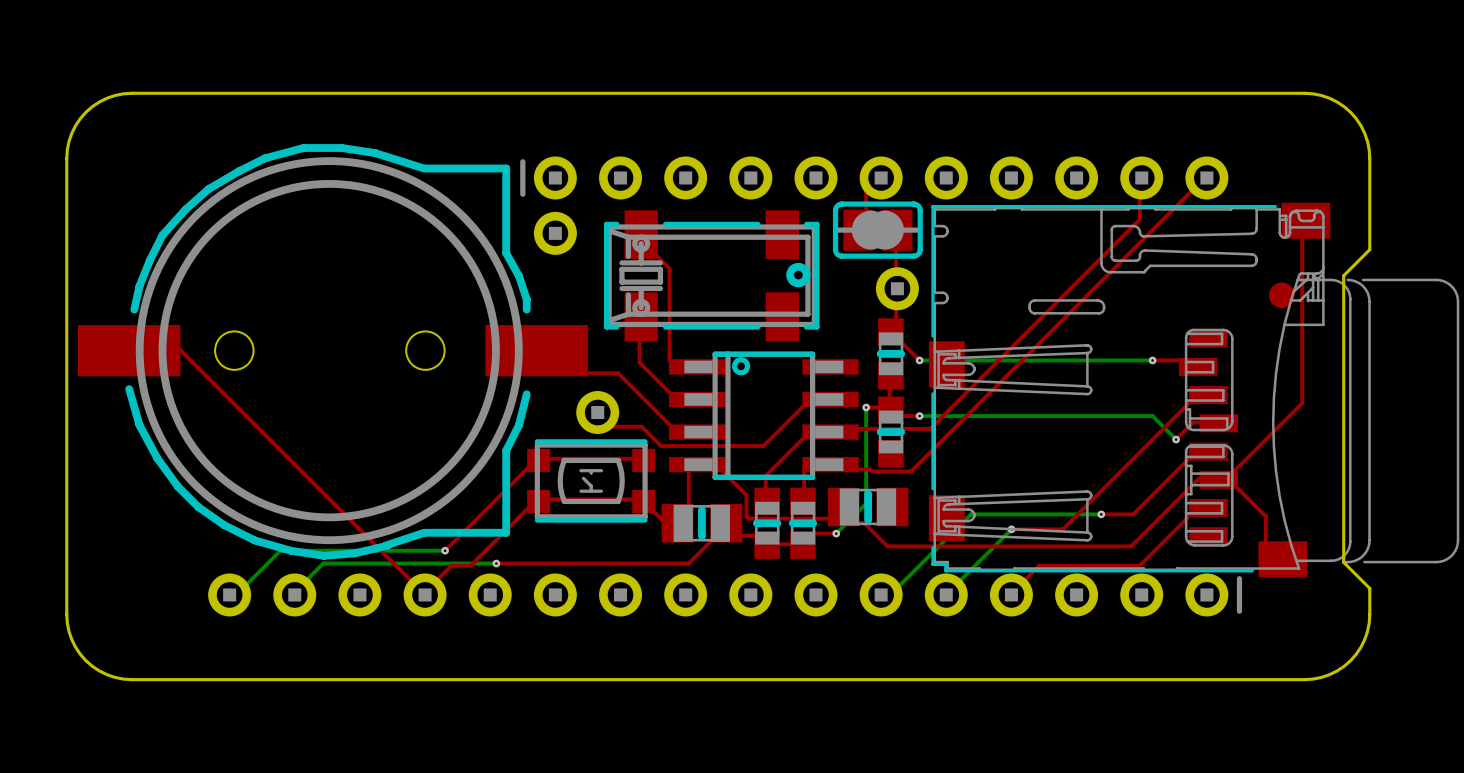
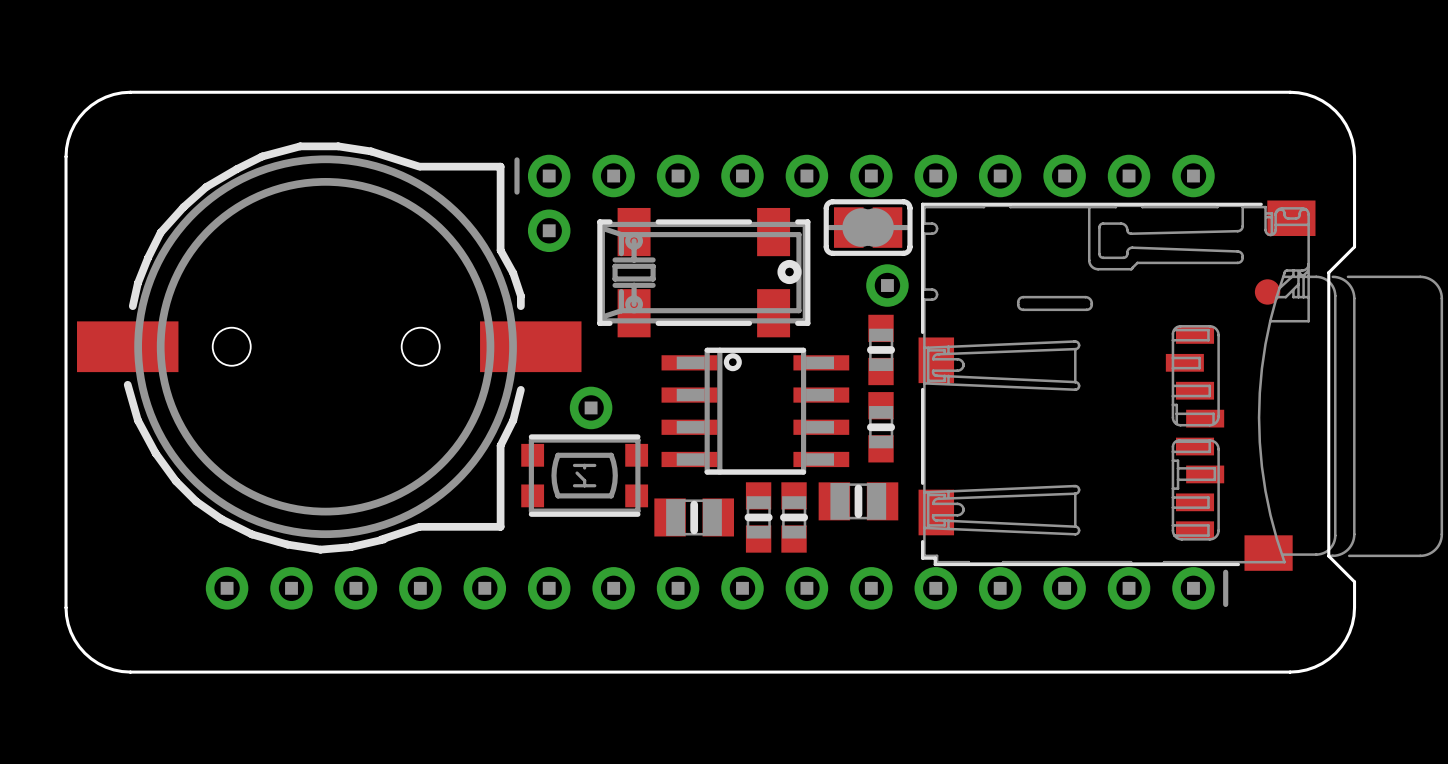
top track: (866, 191) (866, 210) -> none
top track: (1139, 191) (1139, 219) (930, 428) (855, 428) -> none
top track: (1191, 191) (911, 471) (855, 469) -> none
top track: (1302, 234) (1302, 403) (1233, 471) -> none
top track: (896, 249) (896, 272) -> none
top track: (654, 253) (669, 268) (669, 360) -> none
top track: (896, 302) (896, 322) -> none
top track: (639, 336) (639, 362) (669, 392) -> none
top track: (898, 339) (919, 360) -> none
top track: (177, 349) (180, 349) (408, 578) -> none
bottom track: (919, 360) (1152, 360) -> none
via: (919, 360) -> none
top track: (1152, 360) (1180, 360) -> none
via: (1152, 360) -> none
top track: (584, 373) (618, 373) (669, 424) -> none
top track: (889, 383) (889, 401) -> none
top track: (1191, 401) (1062, 529) (1011, 529) -> none
top track: (804, 405) (763, 445) (660, 445) (641, 426) (611, 426) -> none
top track: (866, 407) (881, 407) -> none
bottom track: (866, 407) (866, 503) (836, 533) -> none
via: (866, 407) -> none
top track: (898, 416) (919, 416) -> none
bottom track: (919, 416) (1152, 416) (1176, 439) -> none
via: (919, 416) -> none
top track: (1199, 422) (1193, 422) (1176, 439) -> none
top track: (804, 437) (765, 475) (765, 490) -> none
via: (1176, 439) -> none
top track: (1191, 456) (1133, 514) (1101, 514) -> none
top track: (543, 458) (635, 458) -> none
top track: (530, 465) (445, 550) -> none
top track: (688, 469) (688, 505) -> none
top track: (720, 469) (746, 495) (746, 516) (748, 518) (829, 518) -> none
top track: (804, 469) (804, 490) -> none
top track: (1199, 478) (1131, 546) (887, 546) (864, 522) (855, 522) -> none
top track: (1233, 484) (1265, 516) (1265, 544) -> none
top track: (543, 499) (635, 499) -> none
top track: (530, 505) (470, 565) (451, 565) (438, 578) -> none
top track: (648, 505) (663, 520) -> none
bottom track: (1101, 514) (970, 514) (896, 589) -> none
via: (1101, 514) -> none
top track: (1191, 514) (1139, 565) (1039, 565) (1024, 580) -> none
bottom track: (1011, 529) (960, 580) -> none
via: (1011, 529) -> none
top track: (836, 533) (812, 533) (810, 535) -> none
via: (836, 533) -> none
top track: (737, 535) (757, 535) -> none
top track: (712, 540) (688, 563) (496, 563) -> none
top track: (774, 544) (793, 544) -> none
bottom track: (445, 550) (280, 550) (244, 587) -> none
via: (445, 550) -> none
bottom track: (496, 563) (323, 563) (308, 578) -> none
via: (496, 563) -> none

